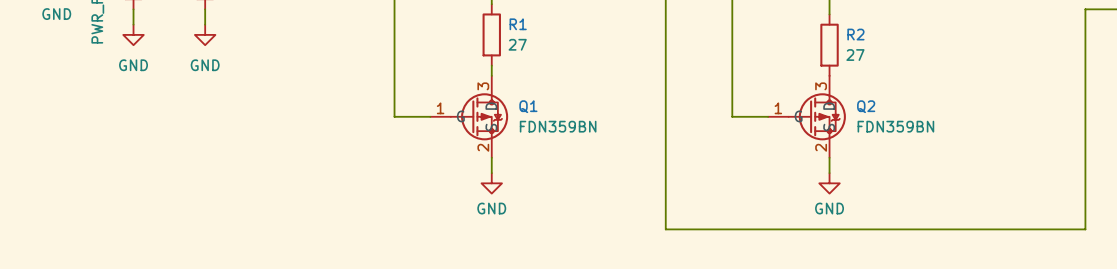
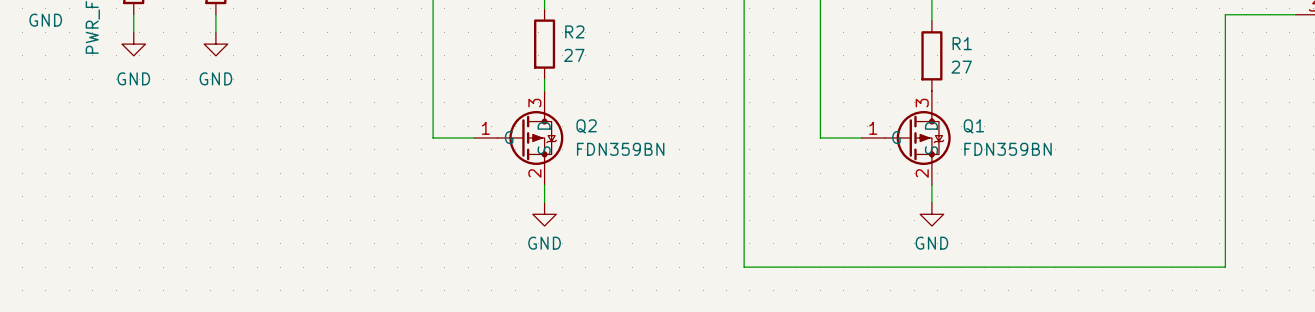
R1 name: R1 (518, 24) -> R2 (574, 31)
R2 name: R2 (855, 34) -> R1 (962, 43)
Q1 name: Q1 (528, 106) -> Q2 (586, 126)
Q2 name: Q2 (866, 106) -> Q1 (973, 126)

